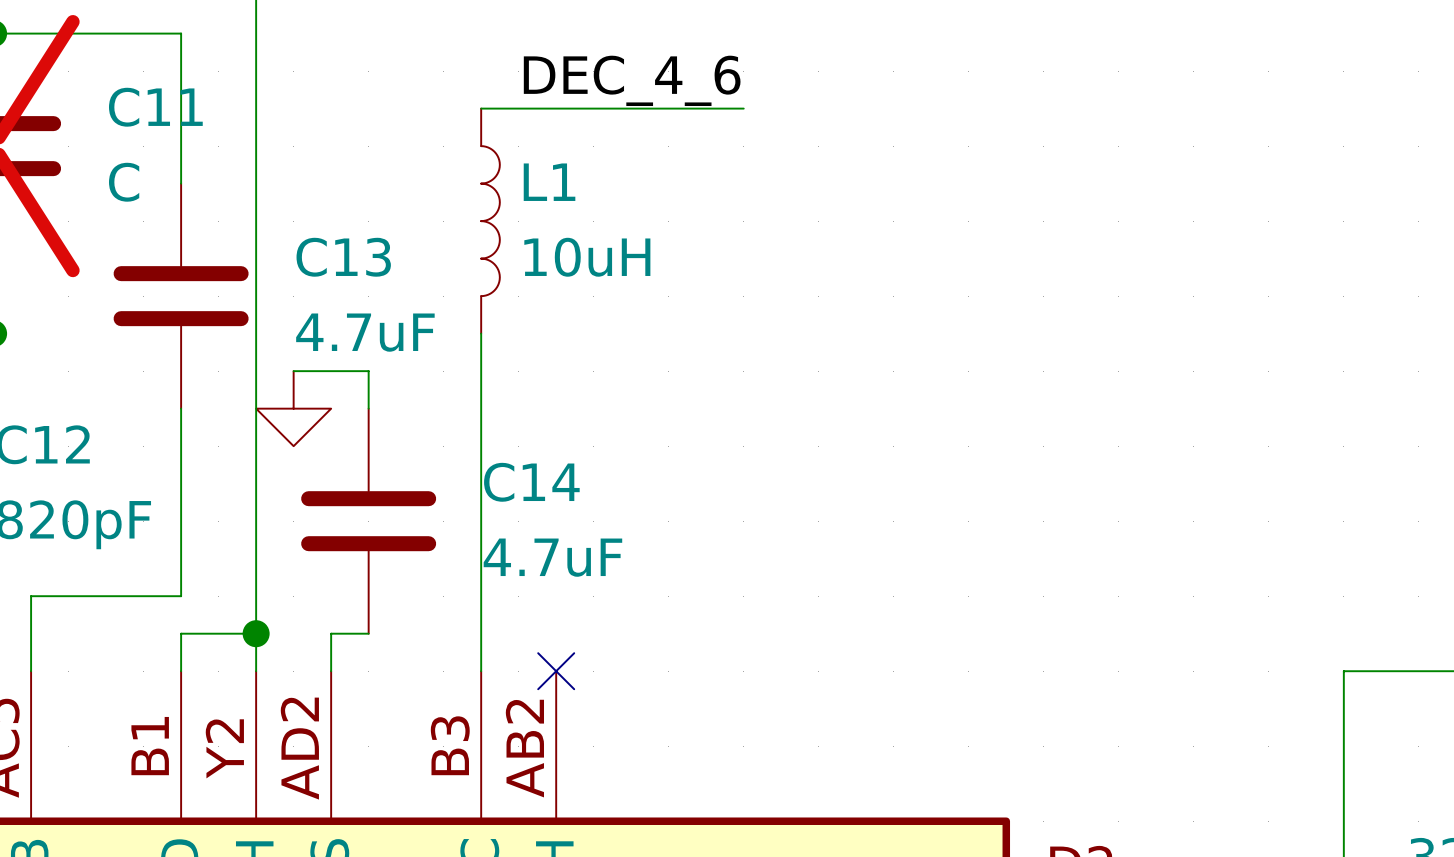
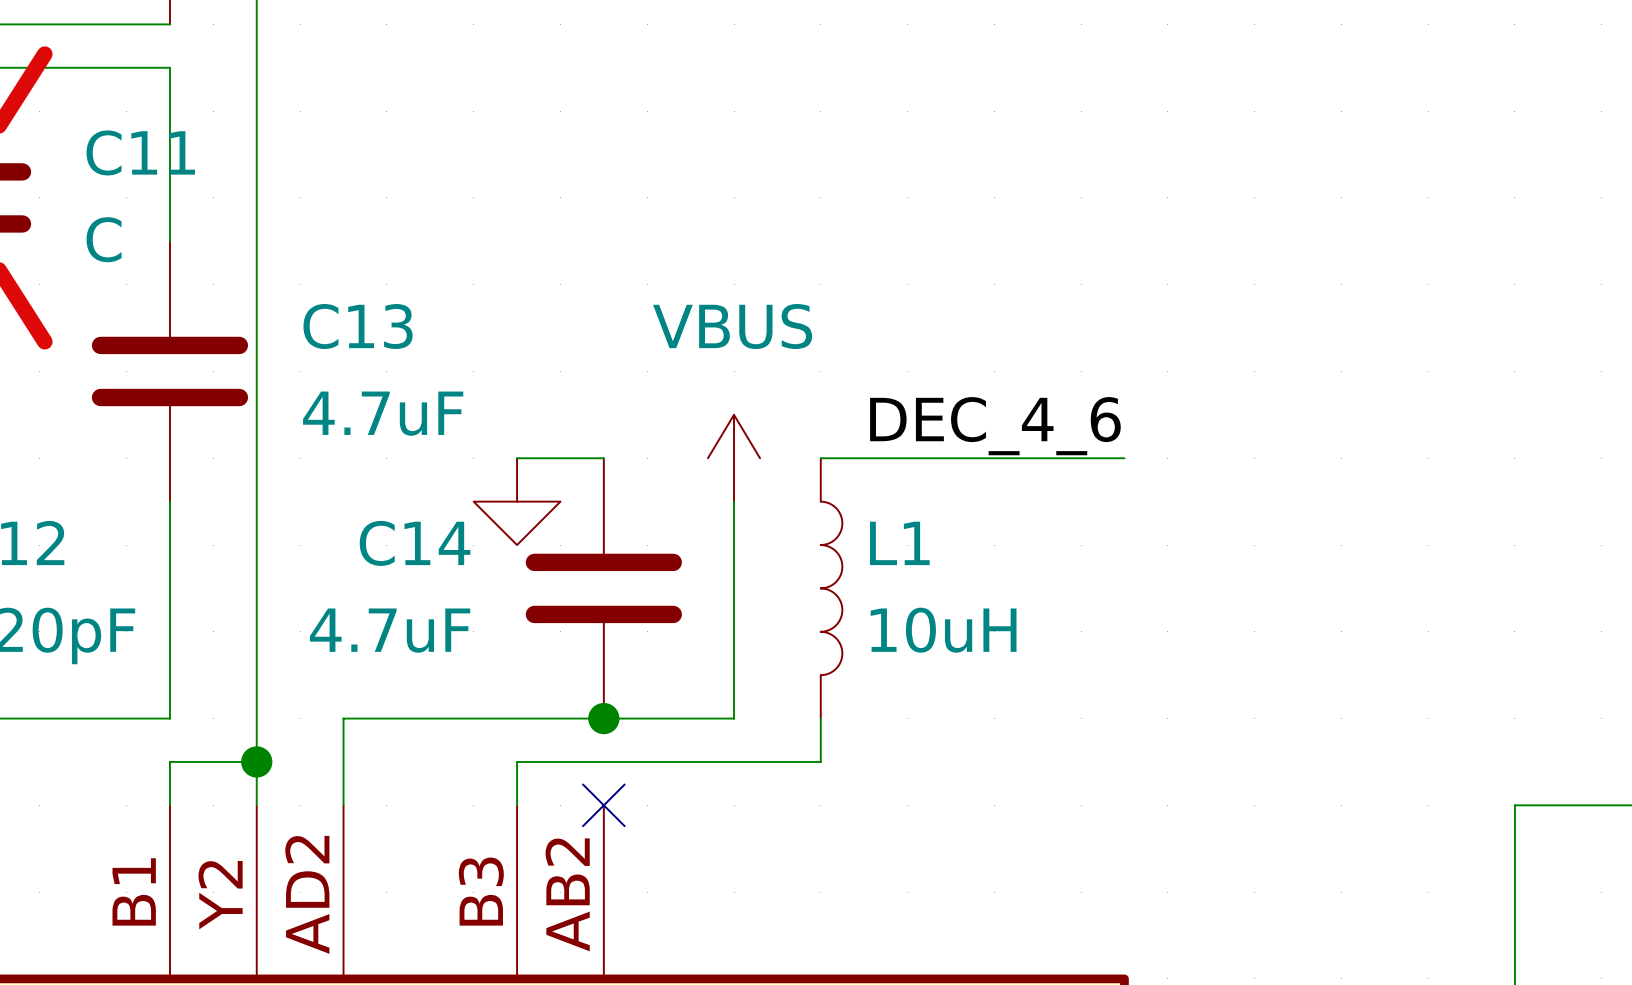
label position: DEC_4_6 (632, 80) -> DEC_4_6 (995, 426)
wire: (481, 108) (743, 108) -> (820, 458) (1124, 458)
L1 position: (490, 221) -> (831, 588)
wire: (481, 333) (481, 633) -> (820, 718) (820, 761) (517, 761)
wire: (293, 371) (368, 371) (368, 408) -> none
wire: none -> (517, 458) (603, 458)
power symbol: none -> VBUS (734, 458)
power symbol position: (293, 408) -> (517, 501)
C14 name position: C14 (531, 482) -> C14 (415, 543)
C14 position: (368, 521) -> (603, 588)
C14 value position: 4.7uF (552, 557) -> 4.7uF (390, 630)
junction: none -> (603, 718)
wire: (331, 633) (368, 633) -> (343, 761) (343, 718) (734, 718) (734, 501)

